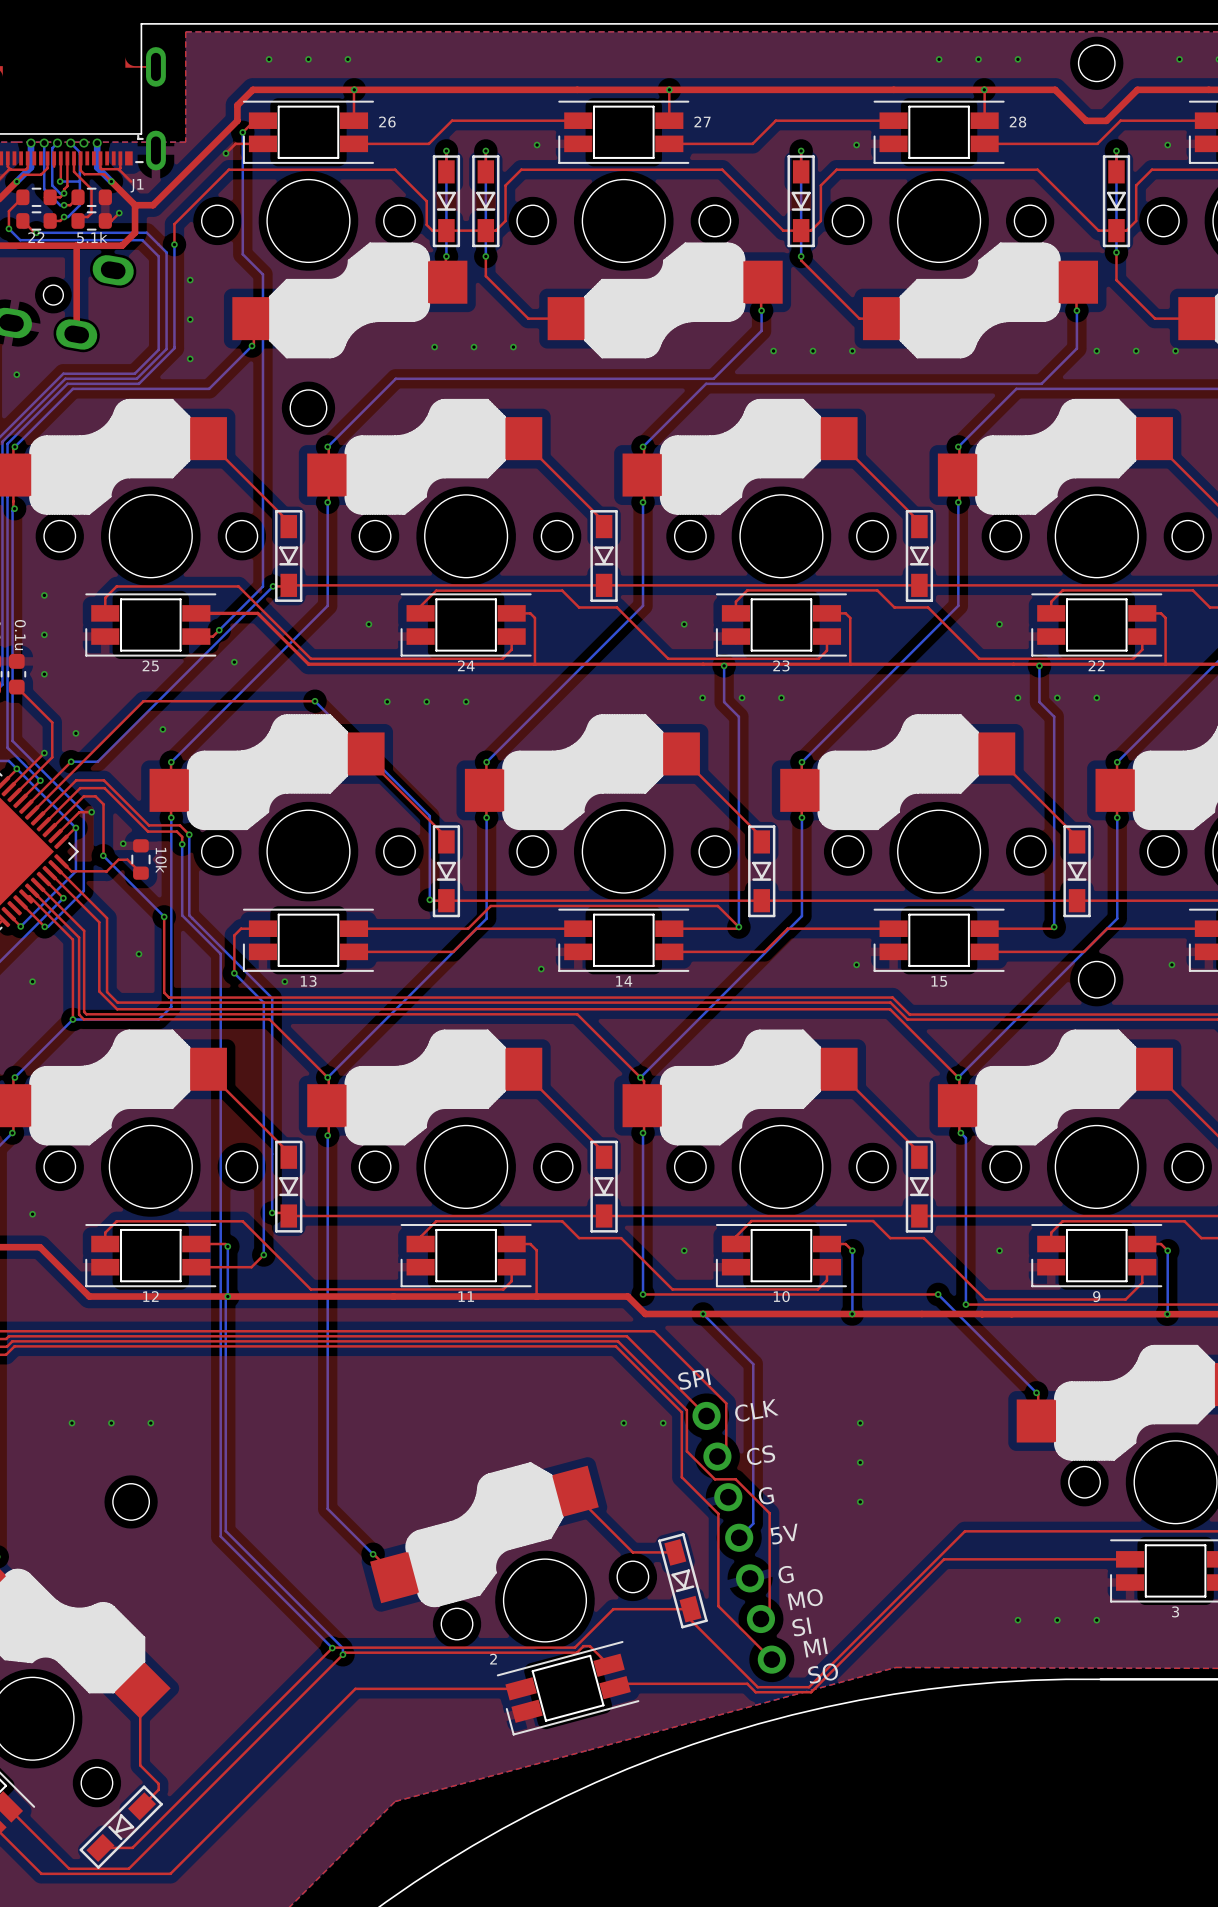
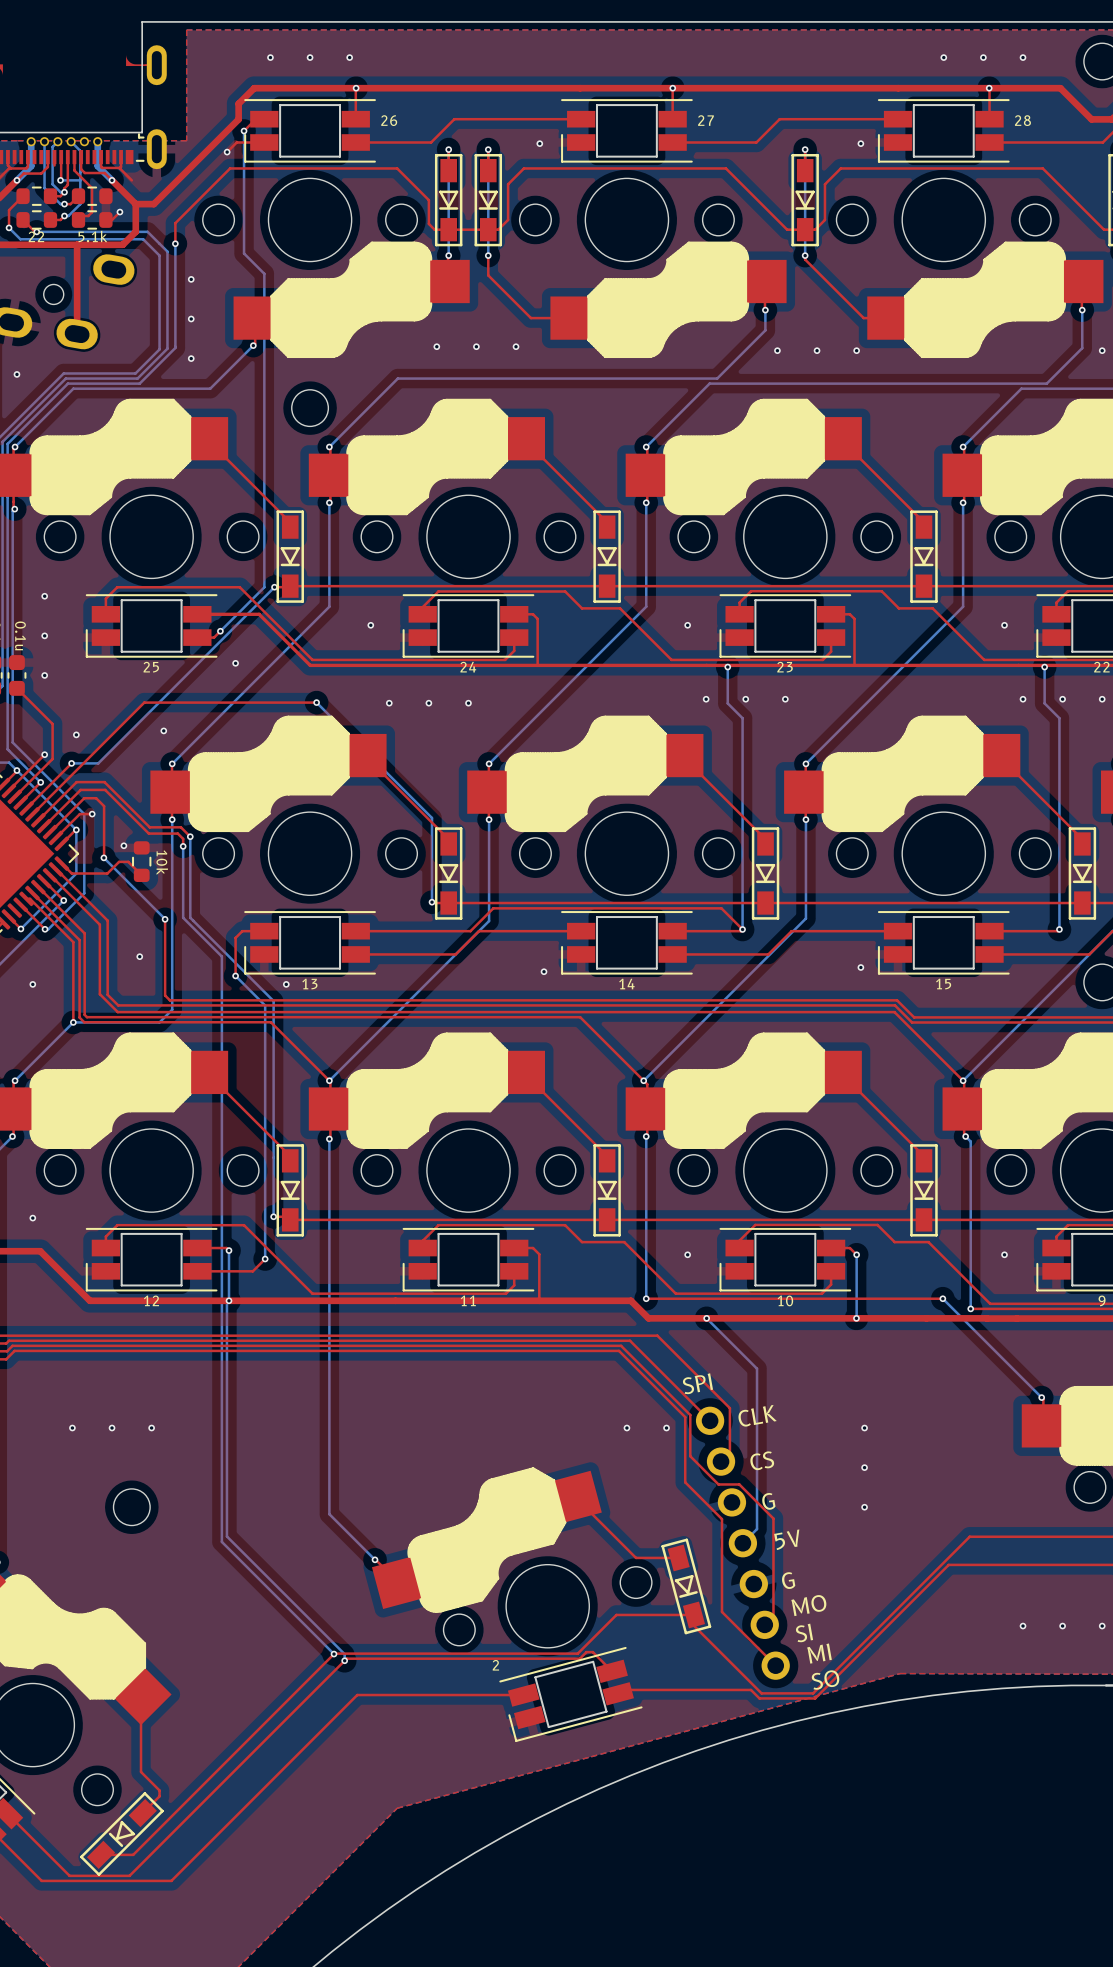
J1 name: J1 (137, 185) -> none

